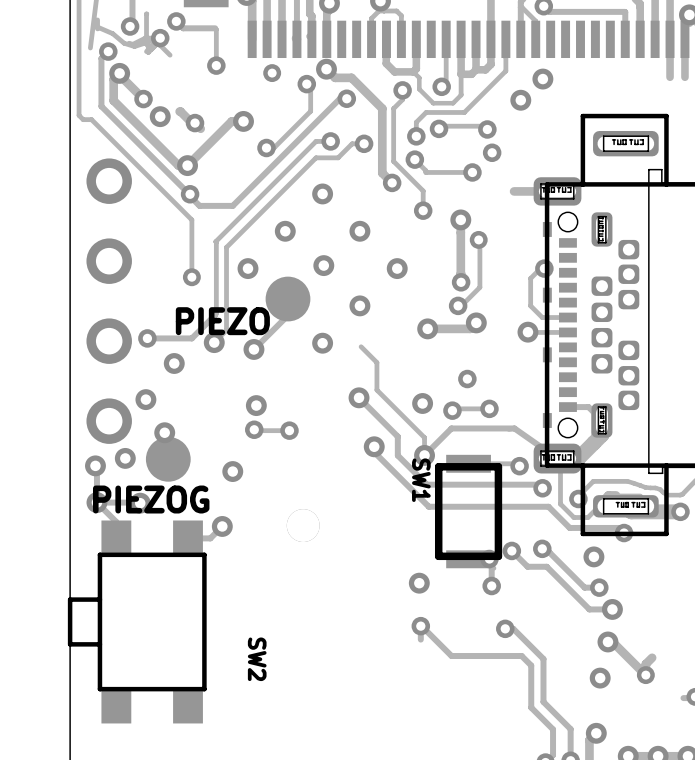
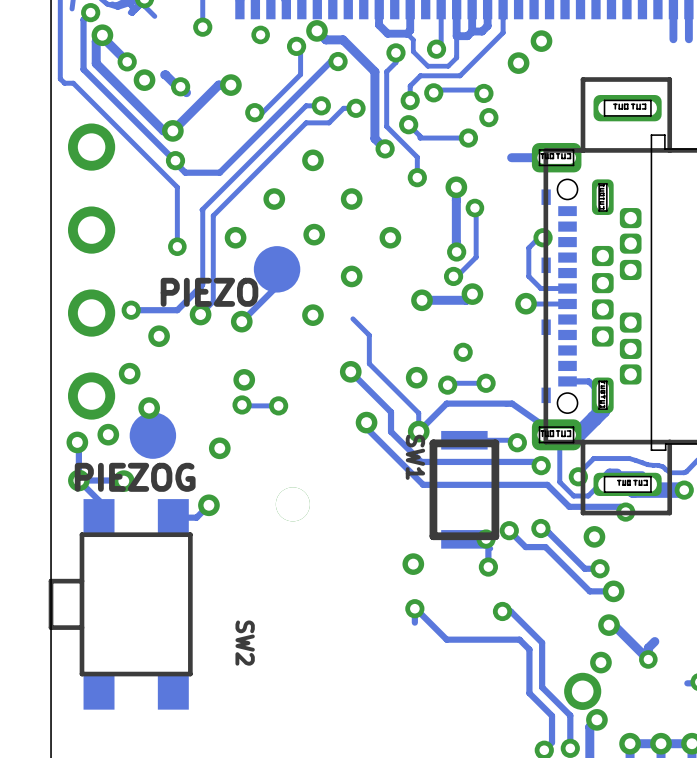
part: none -> (582, 691)

